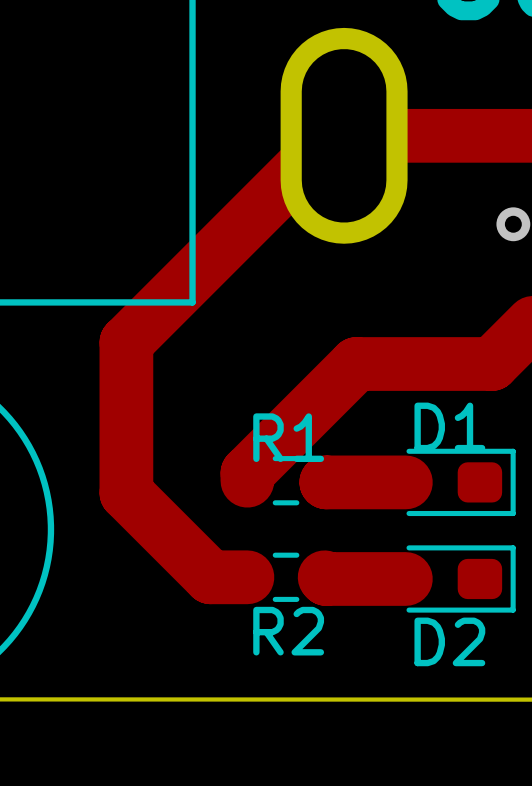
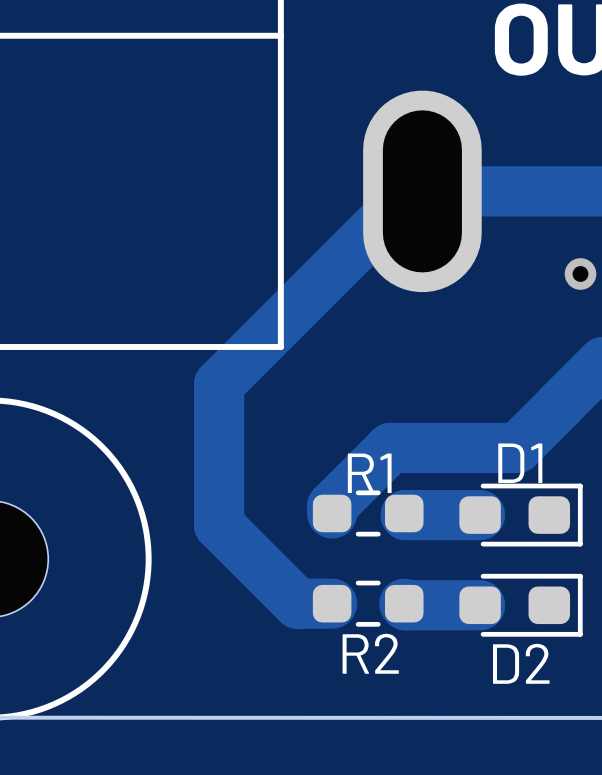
track: (491, 364) (356, 364) (309, 410) -> (560, 404) (517, 447) (390, 447)

